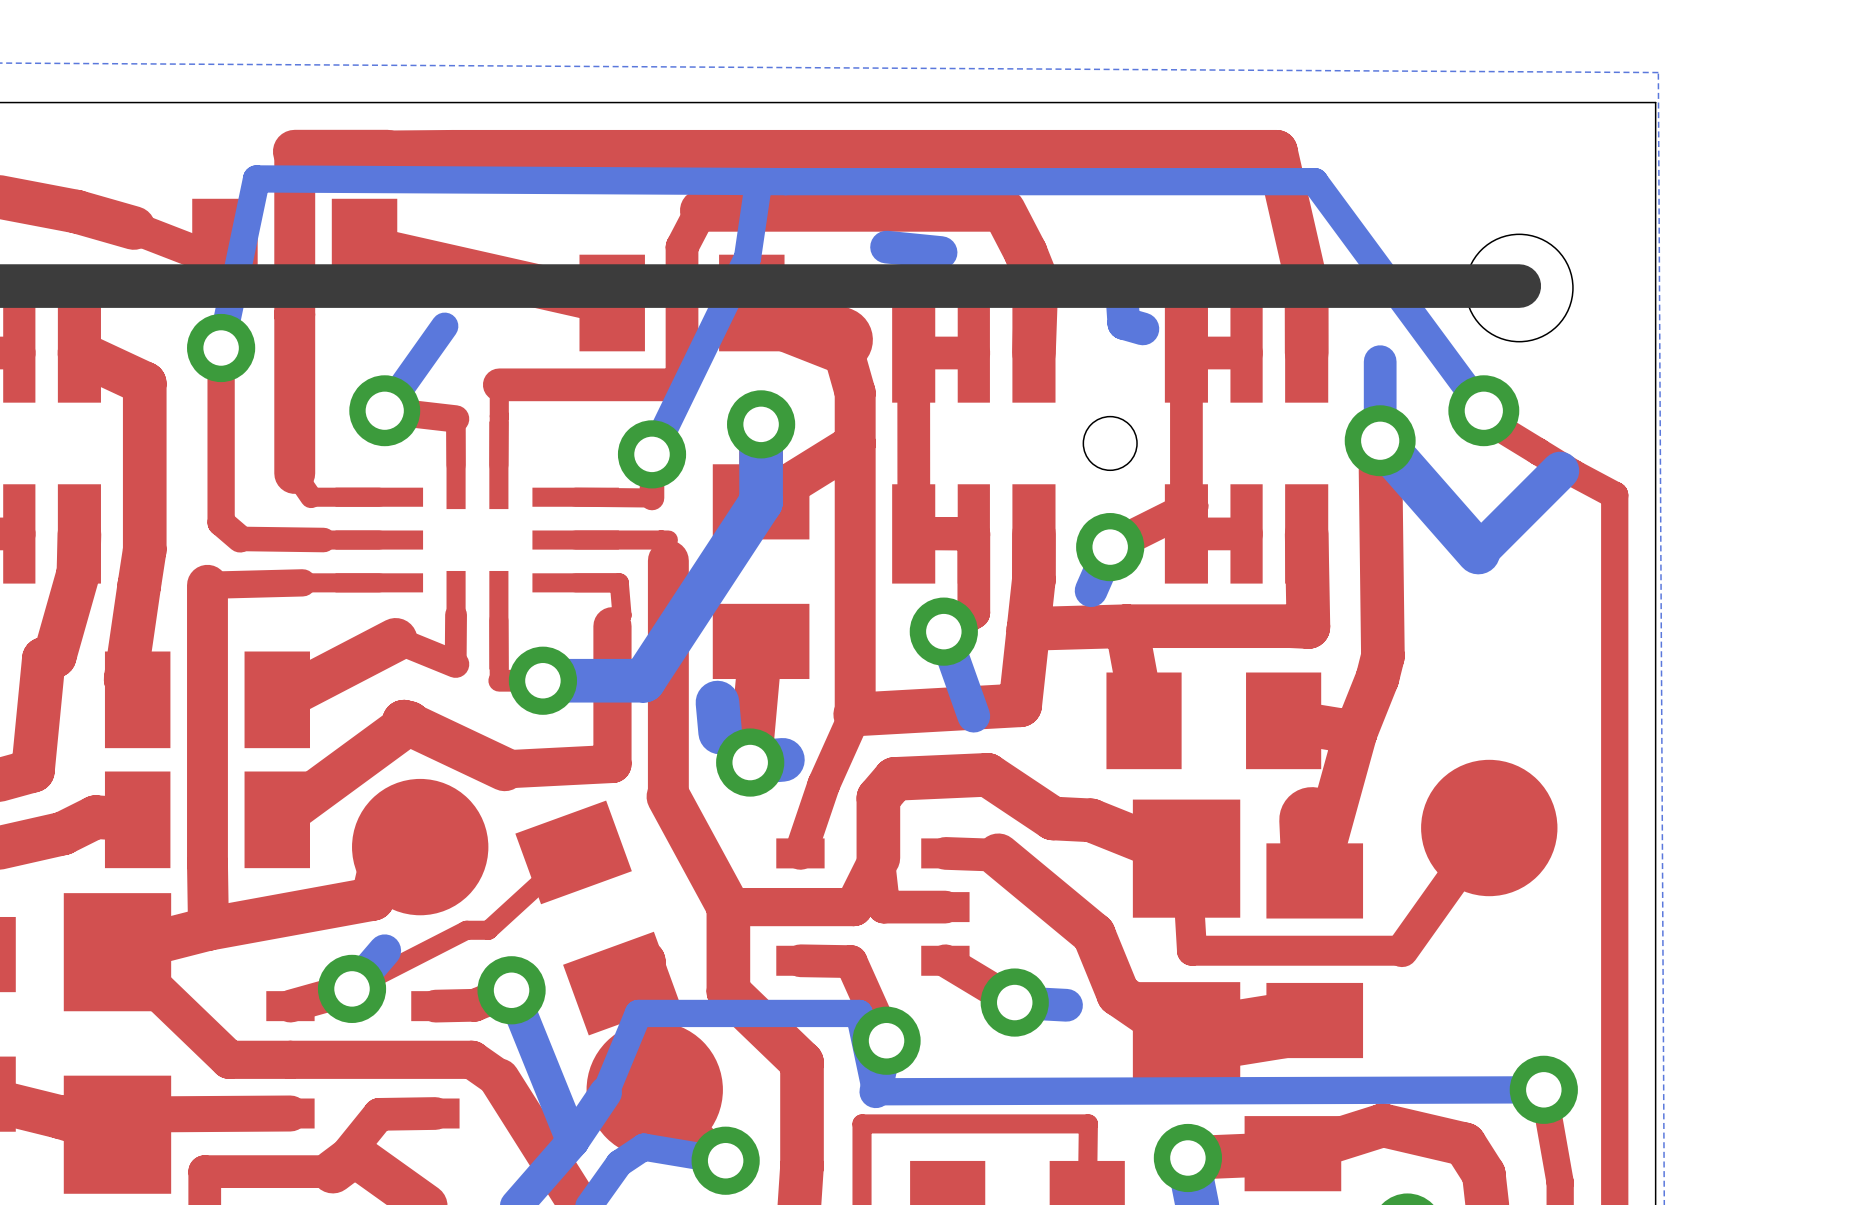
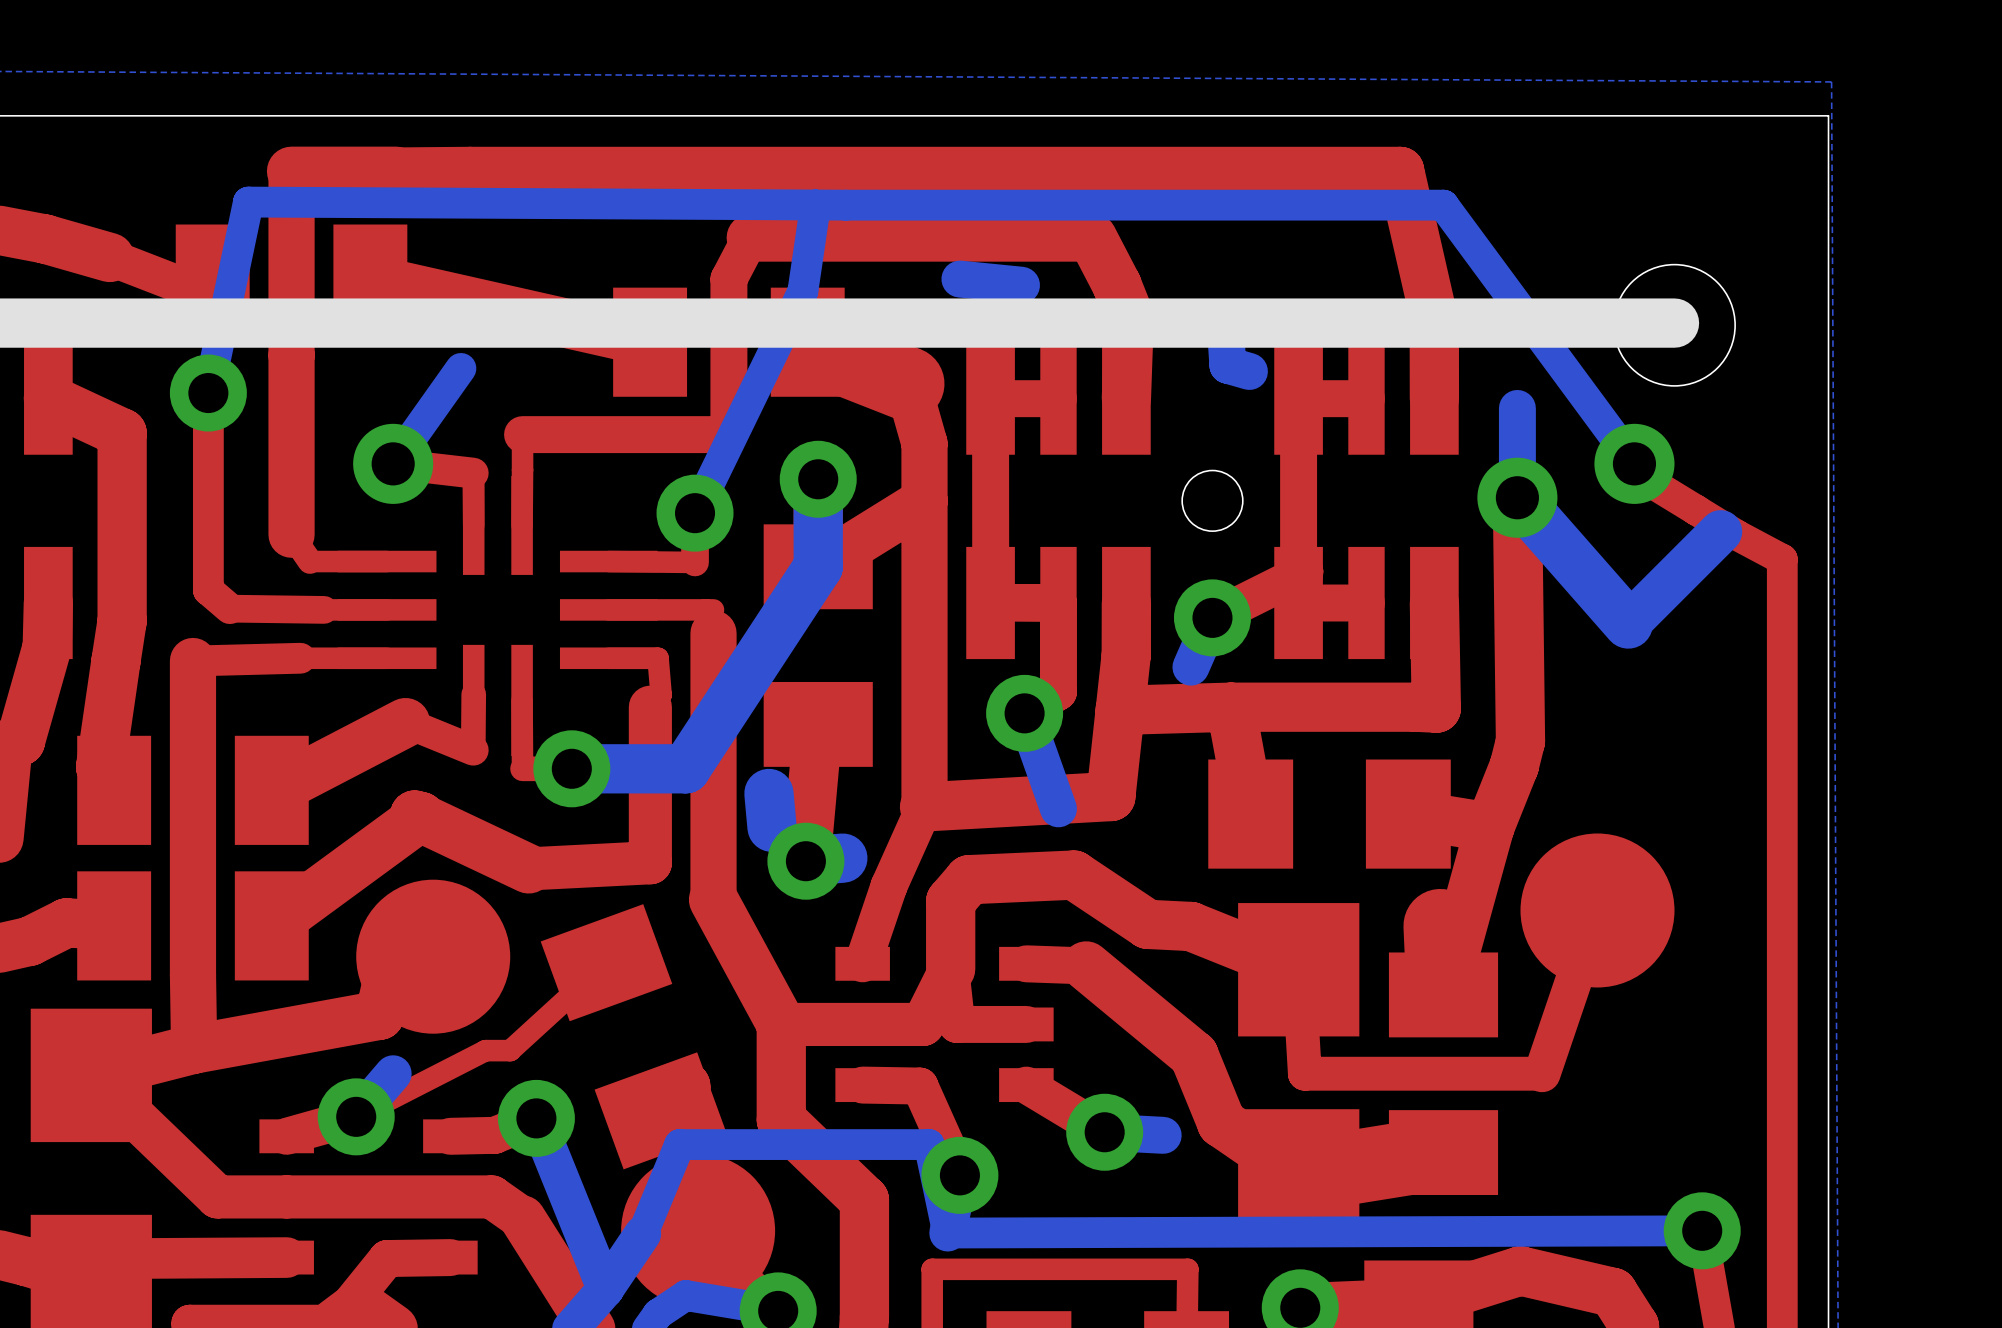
top track: (1489, 828) (1402, 950) -> (1597, 910) (1542, 1073)
part position: (1489, 828) -> (1597, 910)

